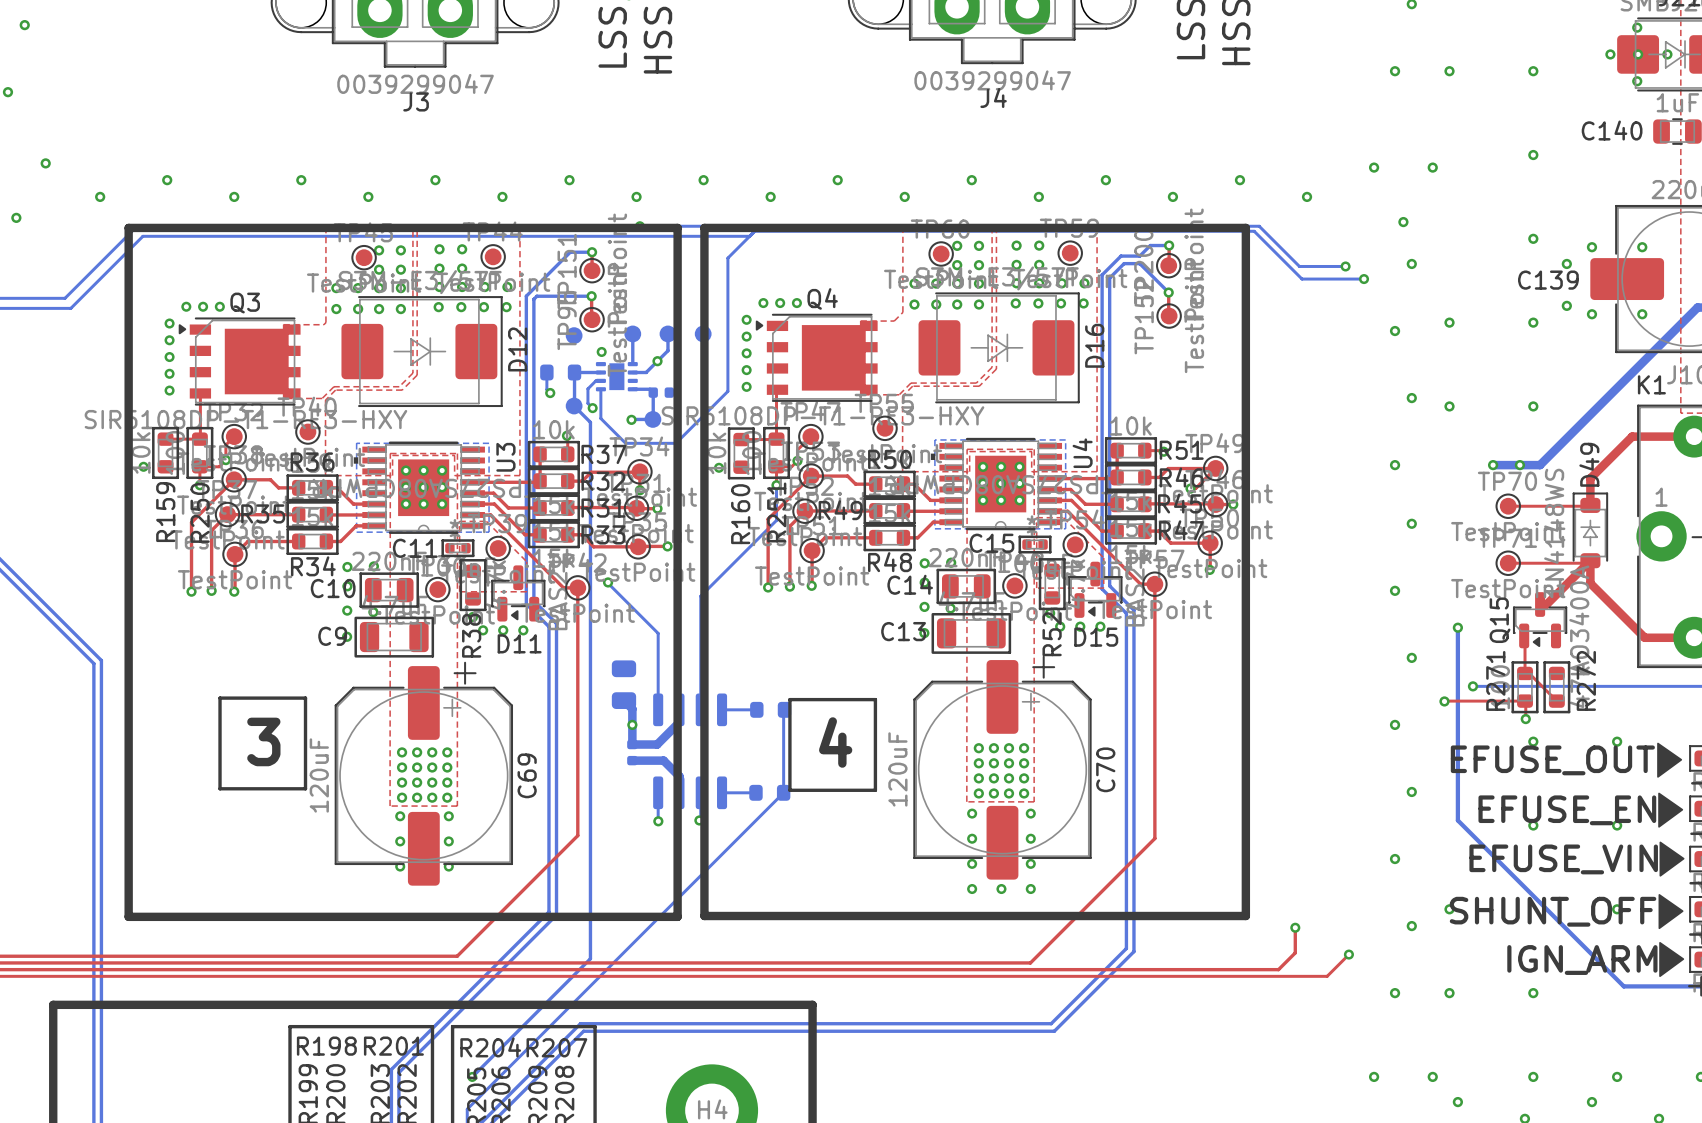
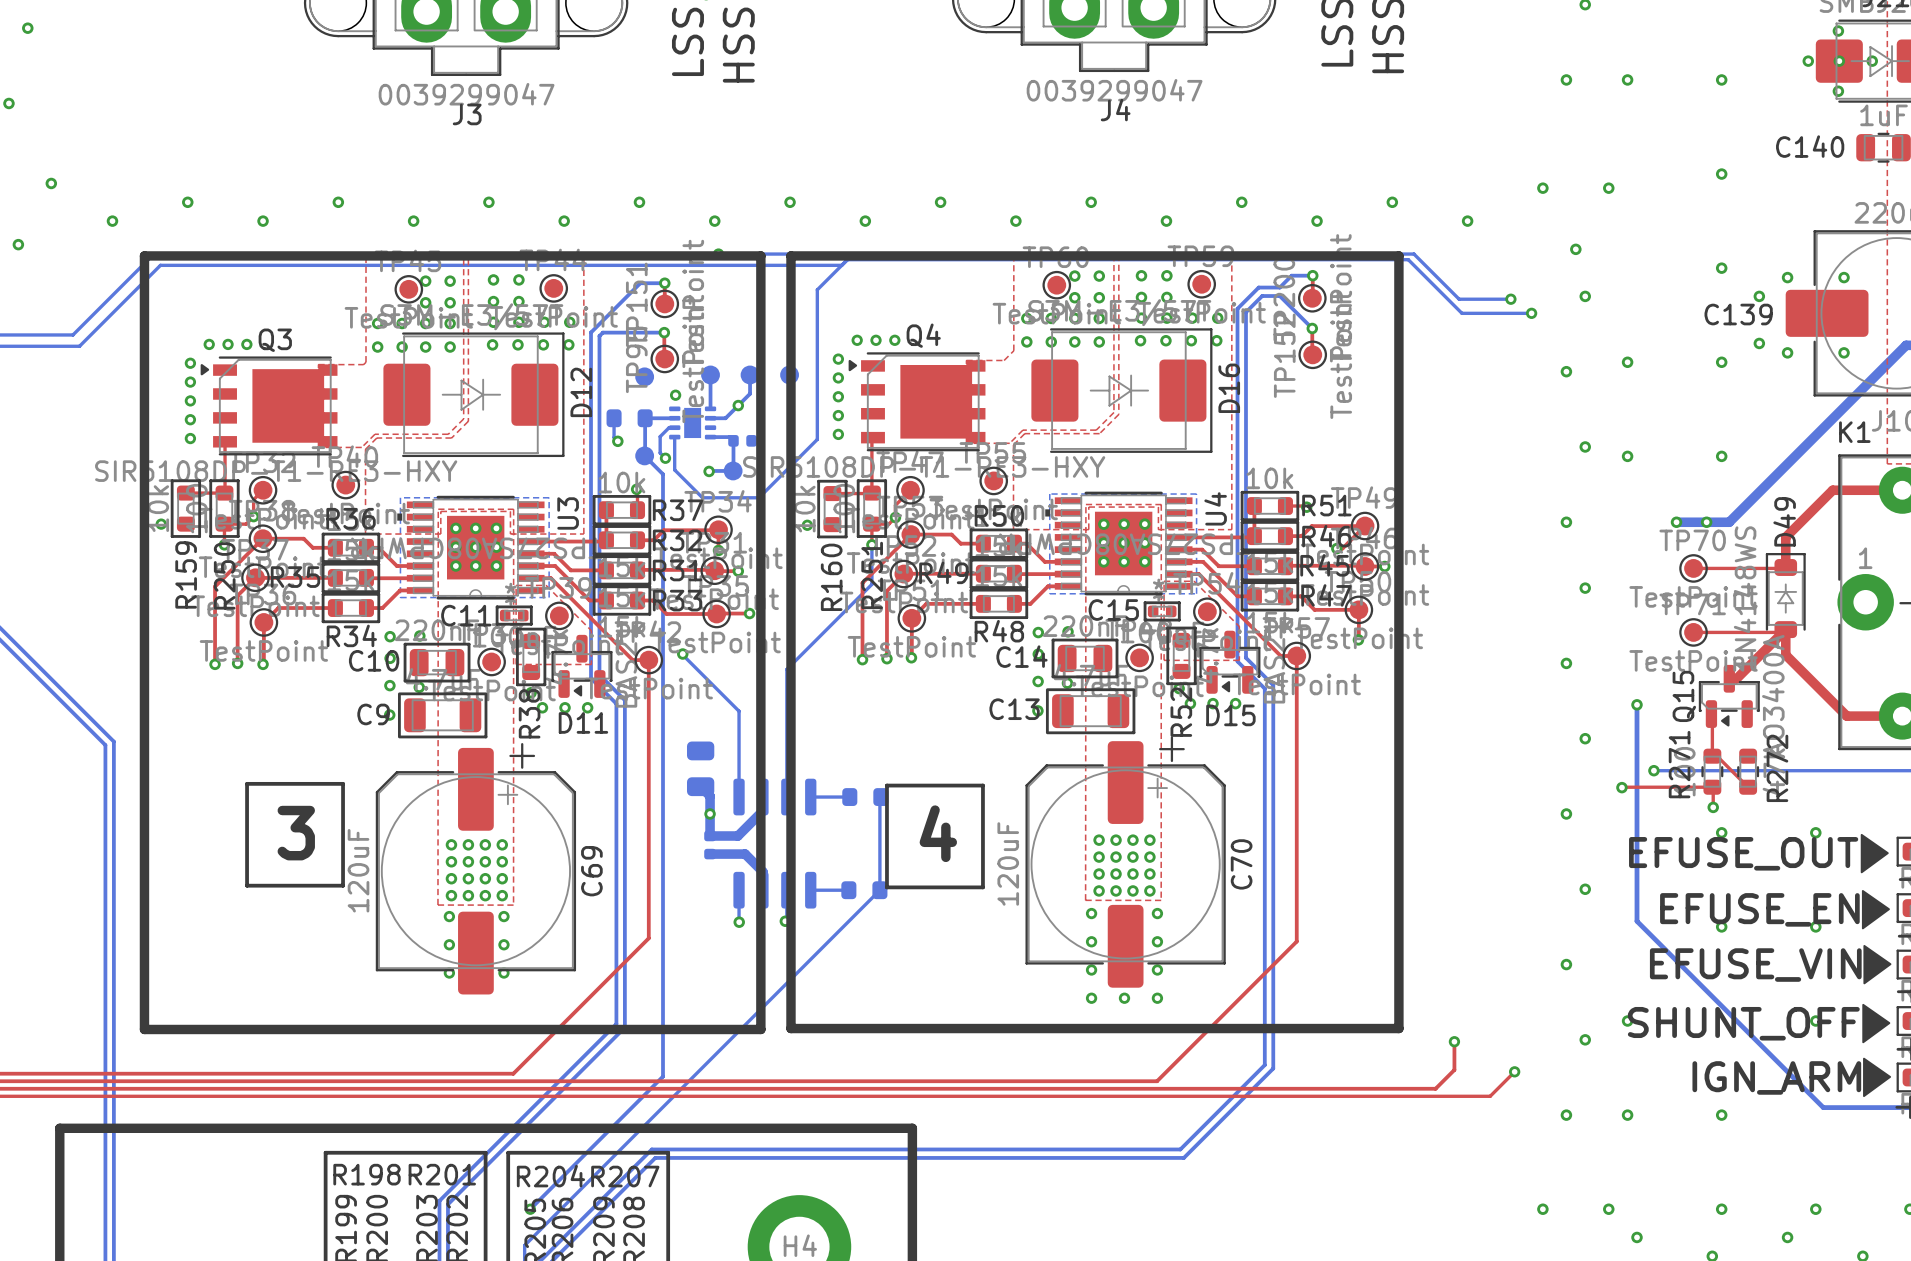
R271 footprint: [1511, 661, 1539, 714] -> [1701, 748, 1724, 795]
R272 footprint: [1543, 661, 1571, 714] -> [1737, 748, 1760, 795]

